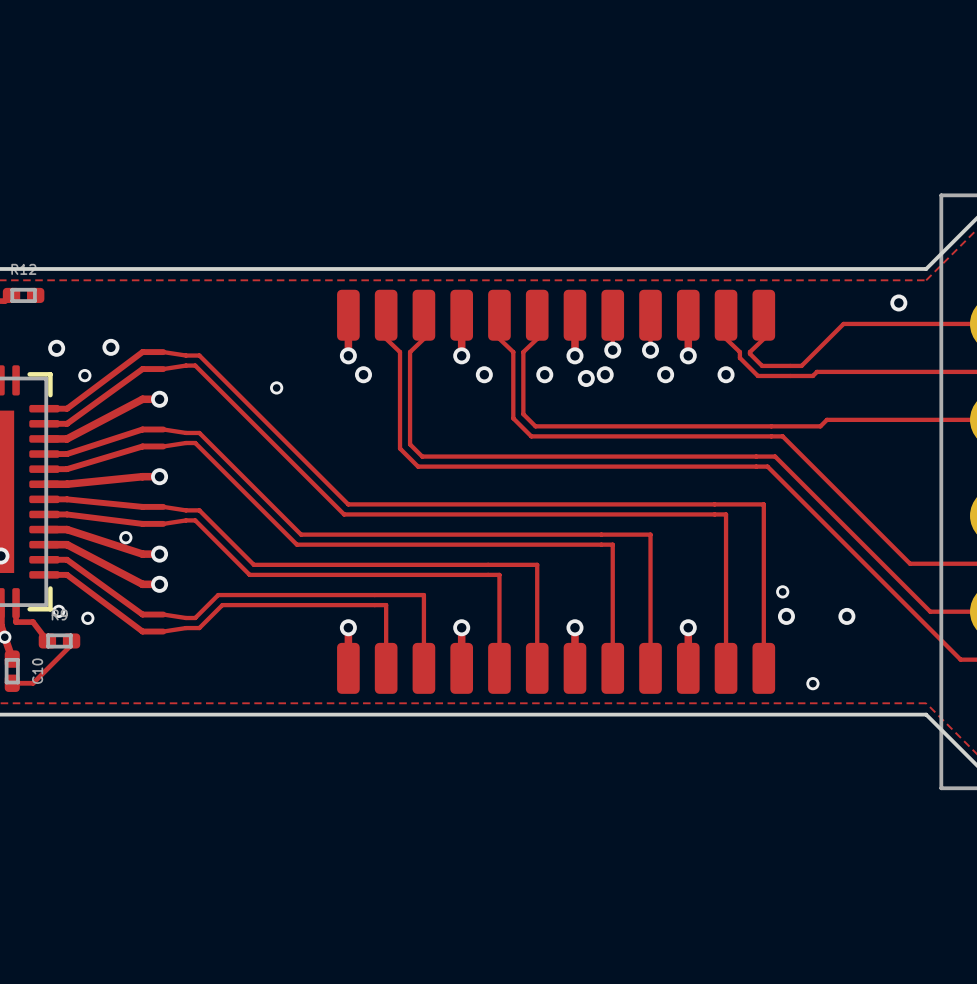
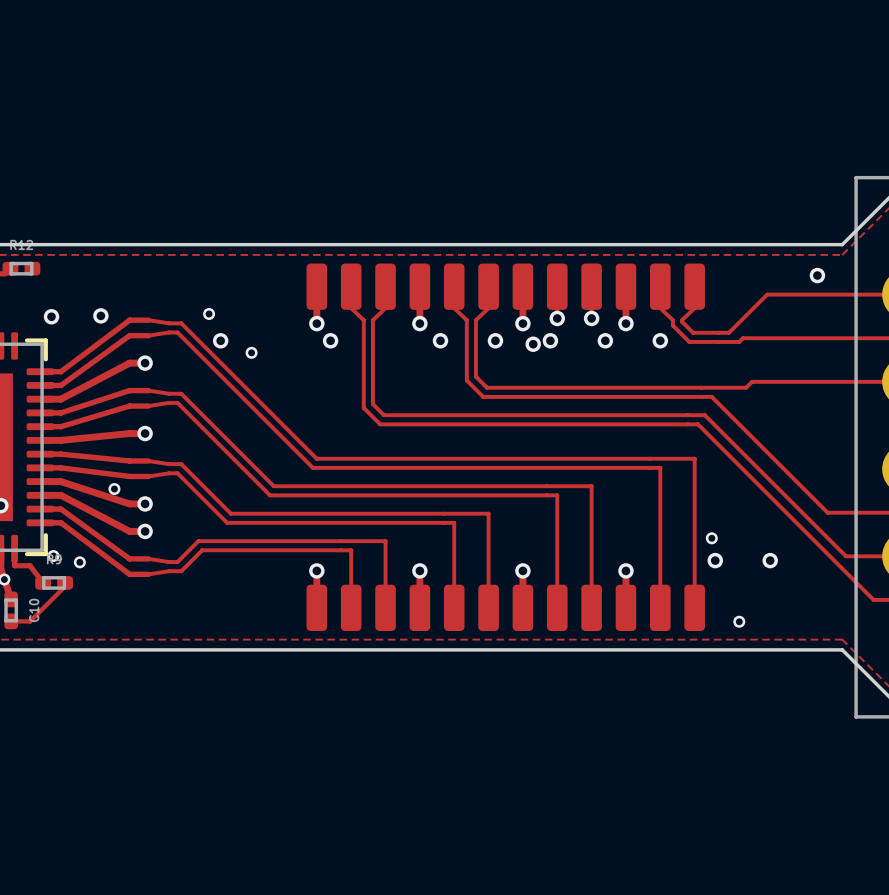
via: none -> (220, 340)
via position: (84, 375) -> (209, 313)

